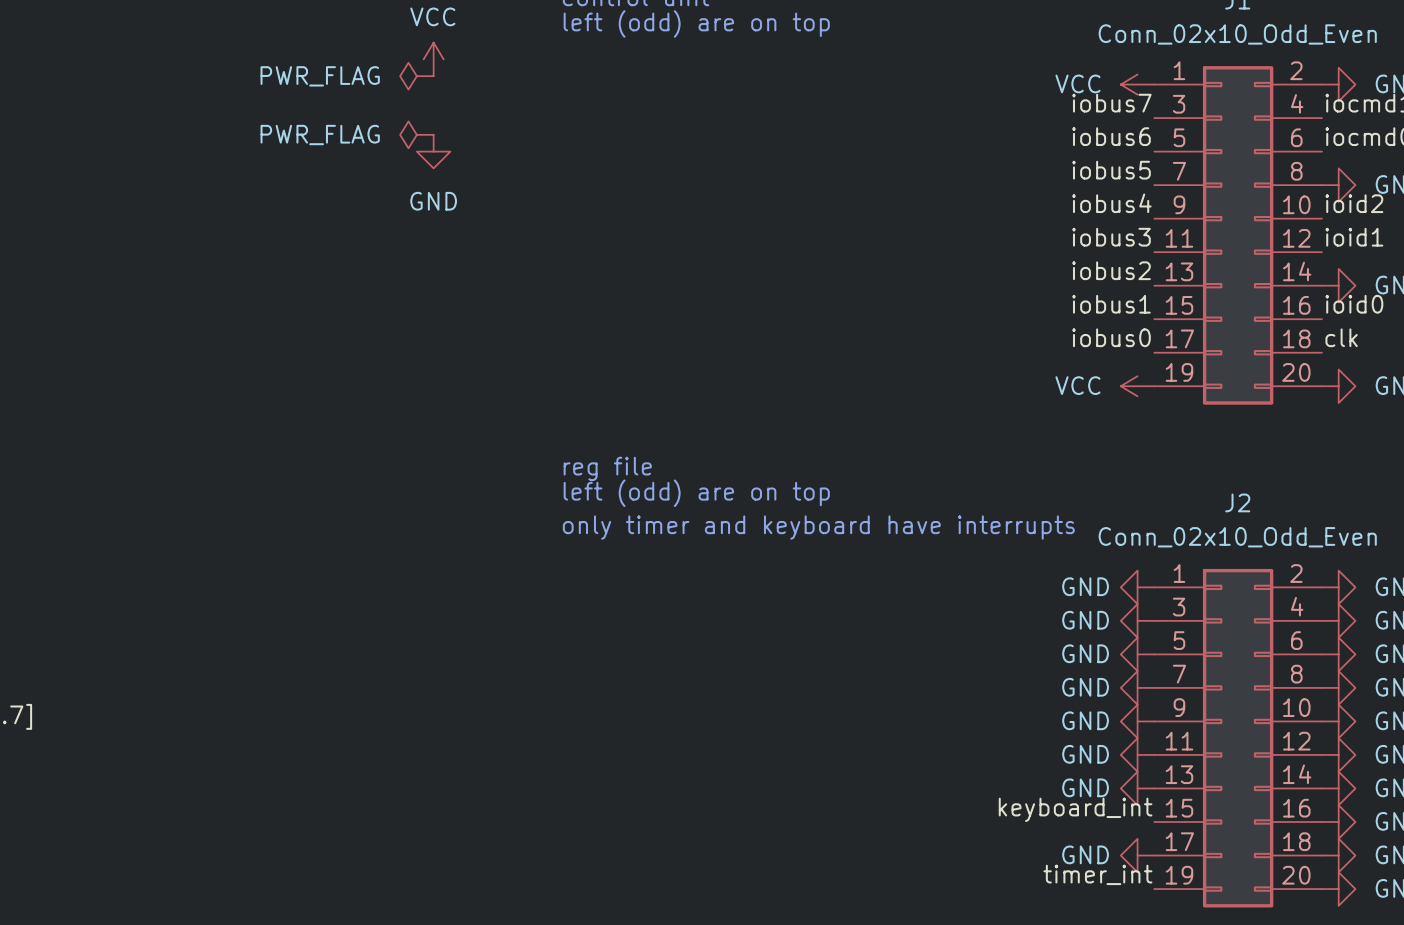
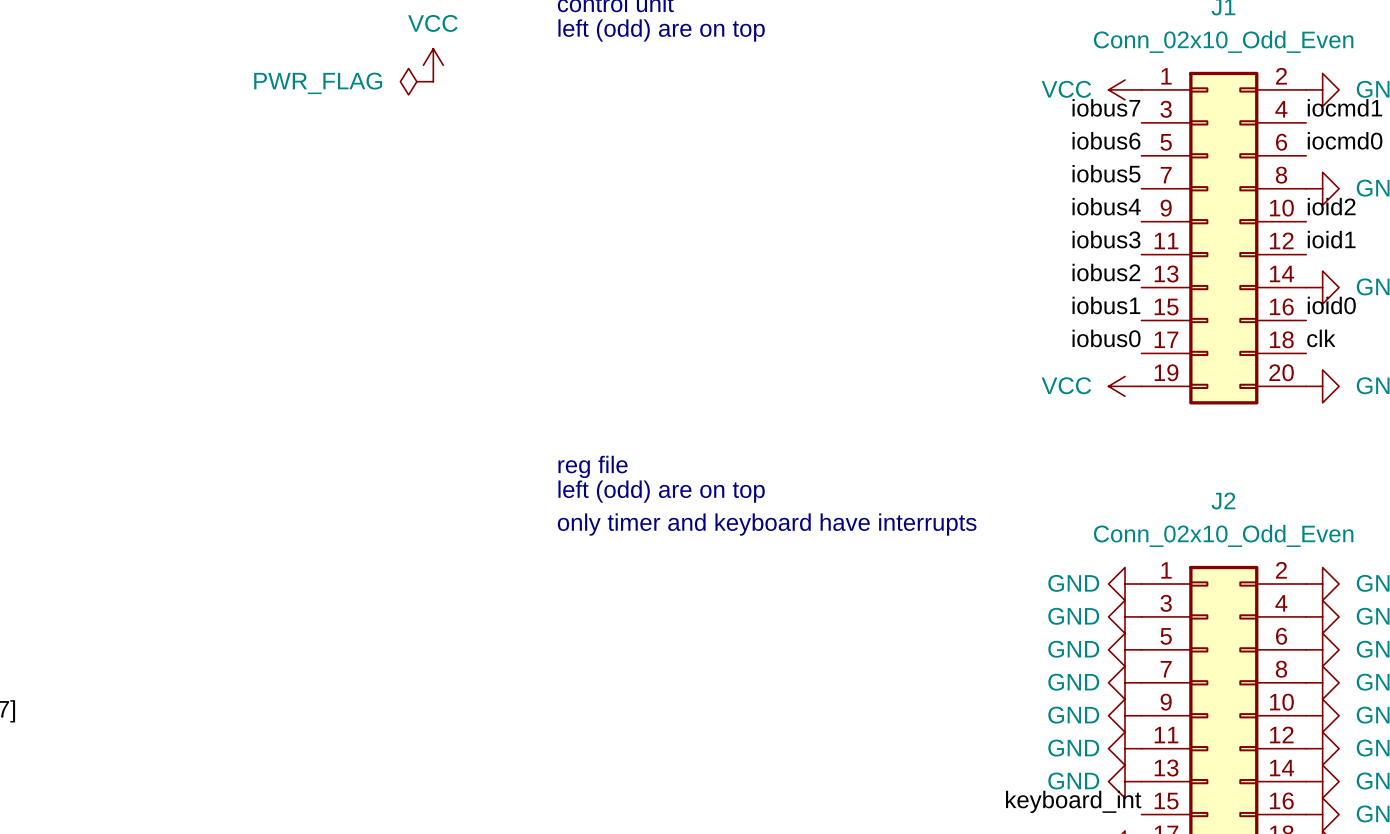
power symbol: PWR_FLAG (416, 134) -> none
power symbol: GND (433, 151) -> none

